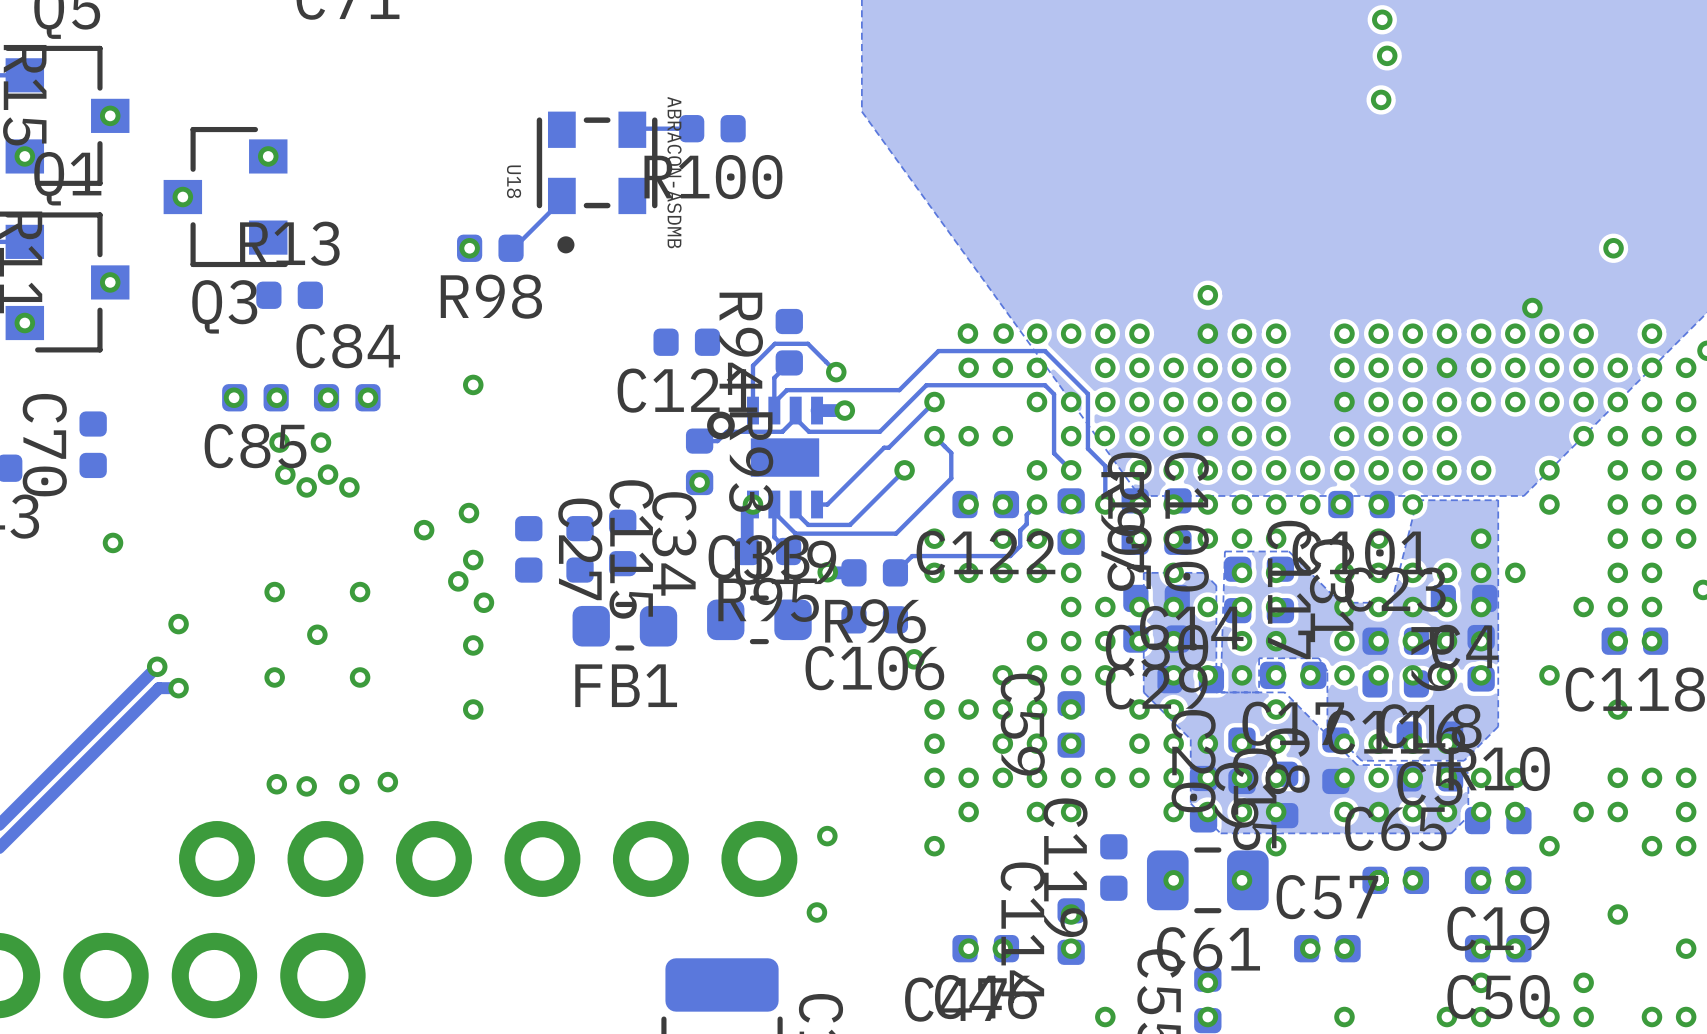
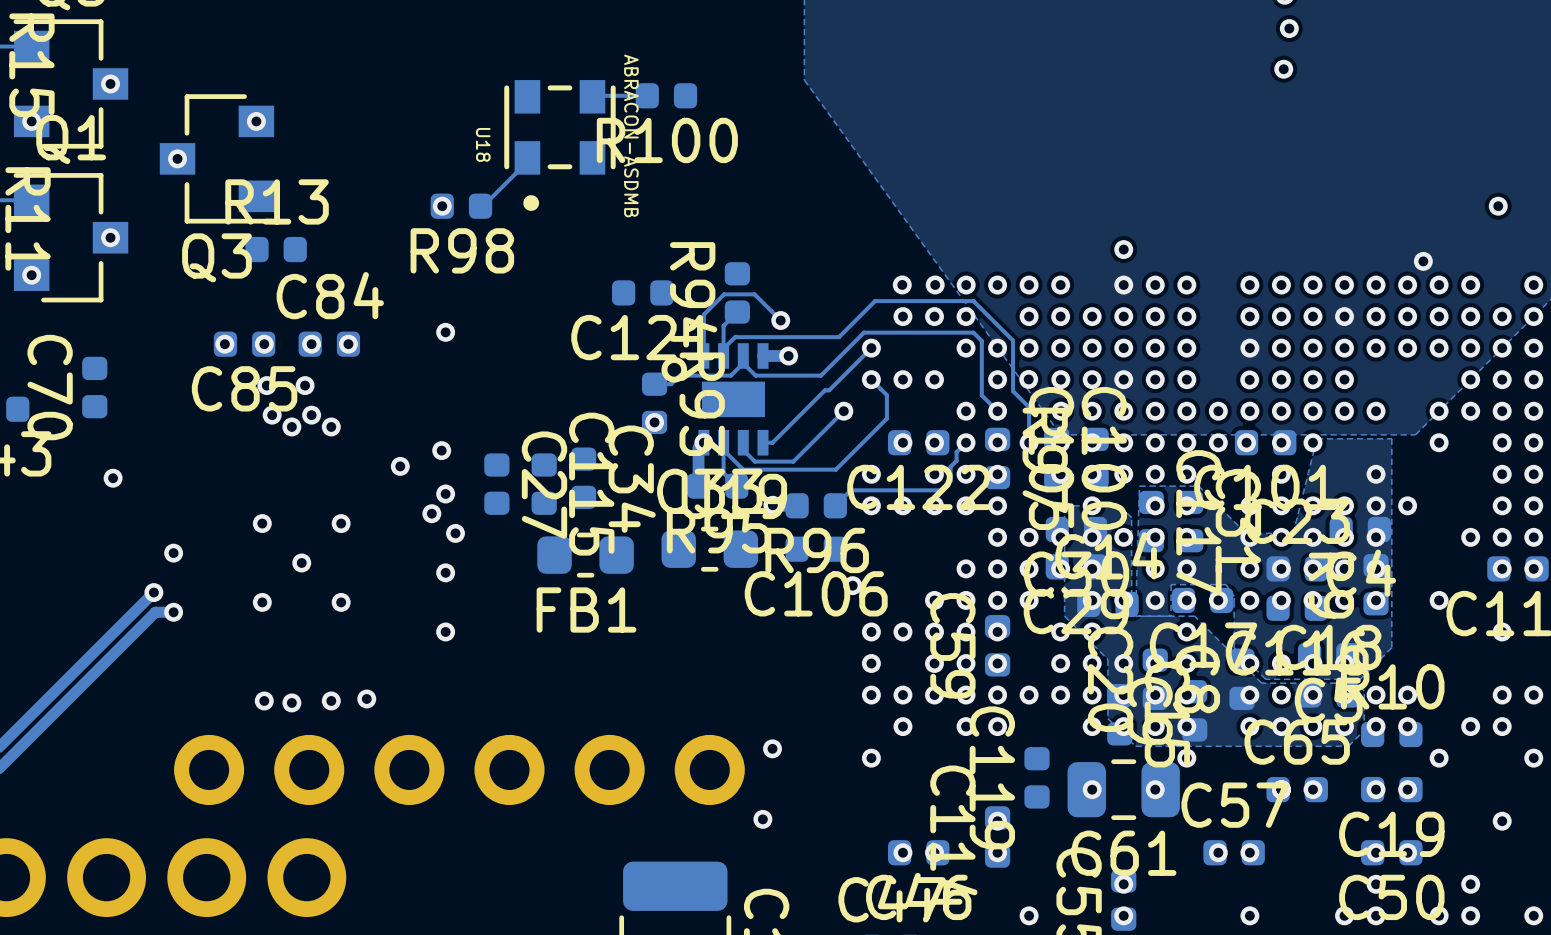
via: none -> (1470, 411)

